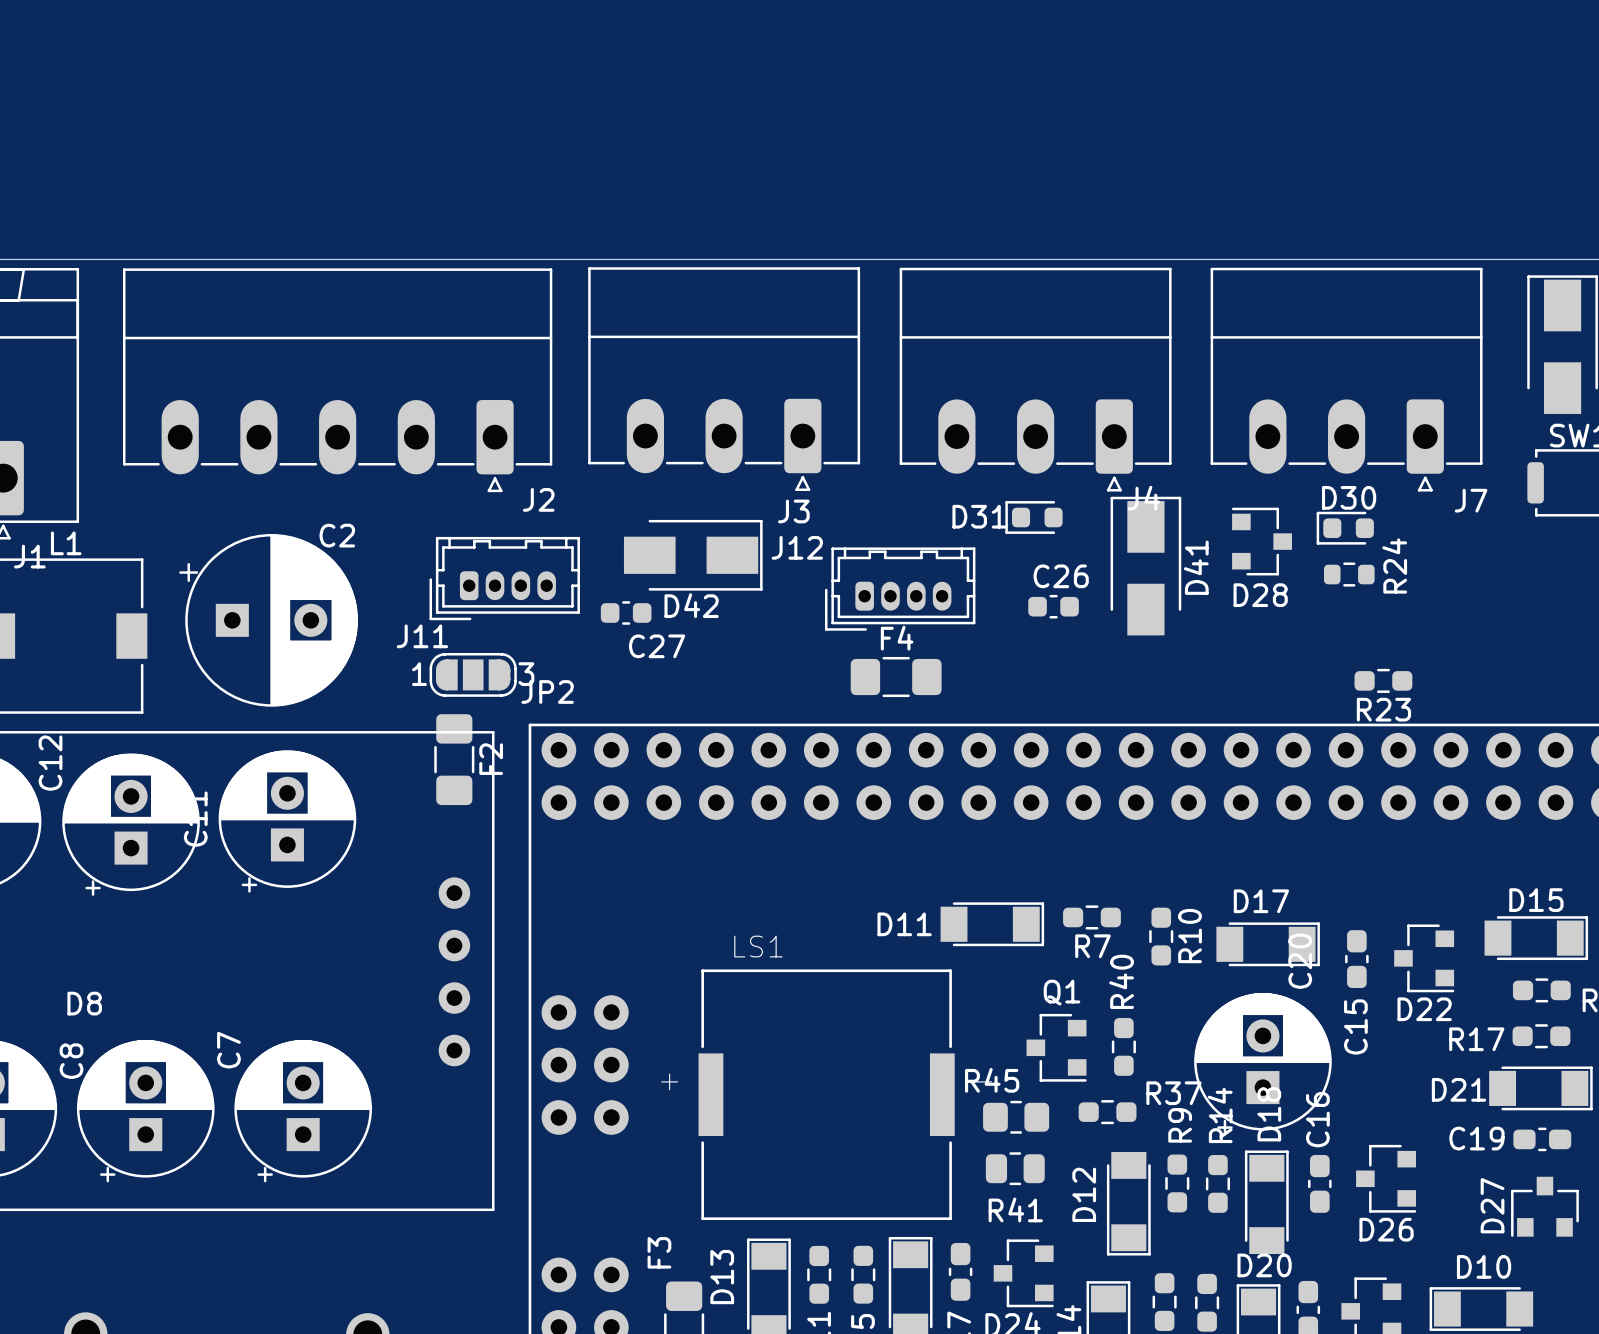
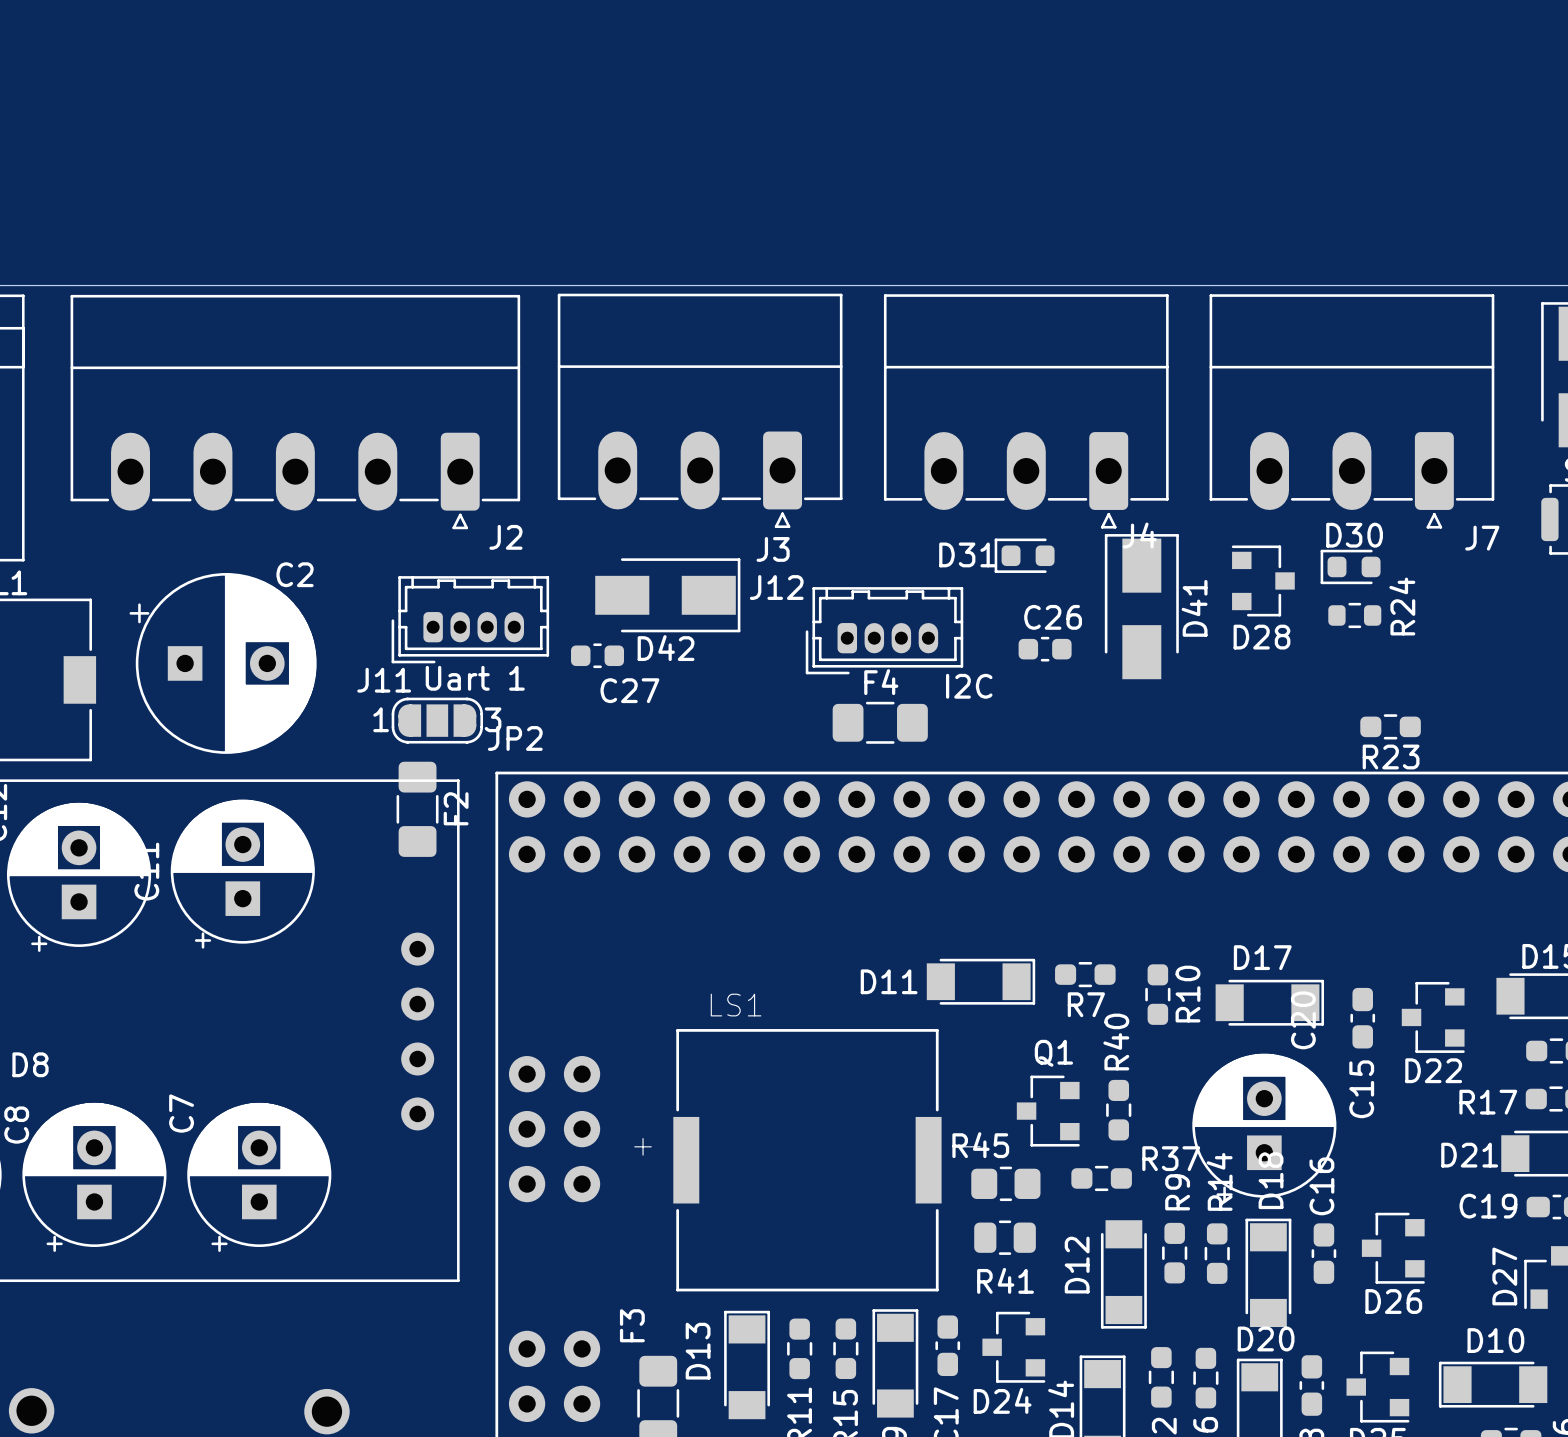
text: none -> Uart 1 (475, 678)
text: none -> I2C (969, 686)

